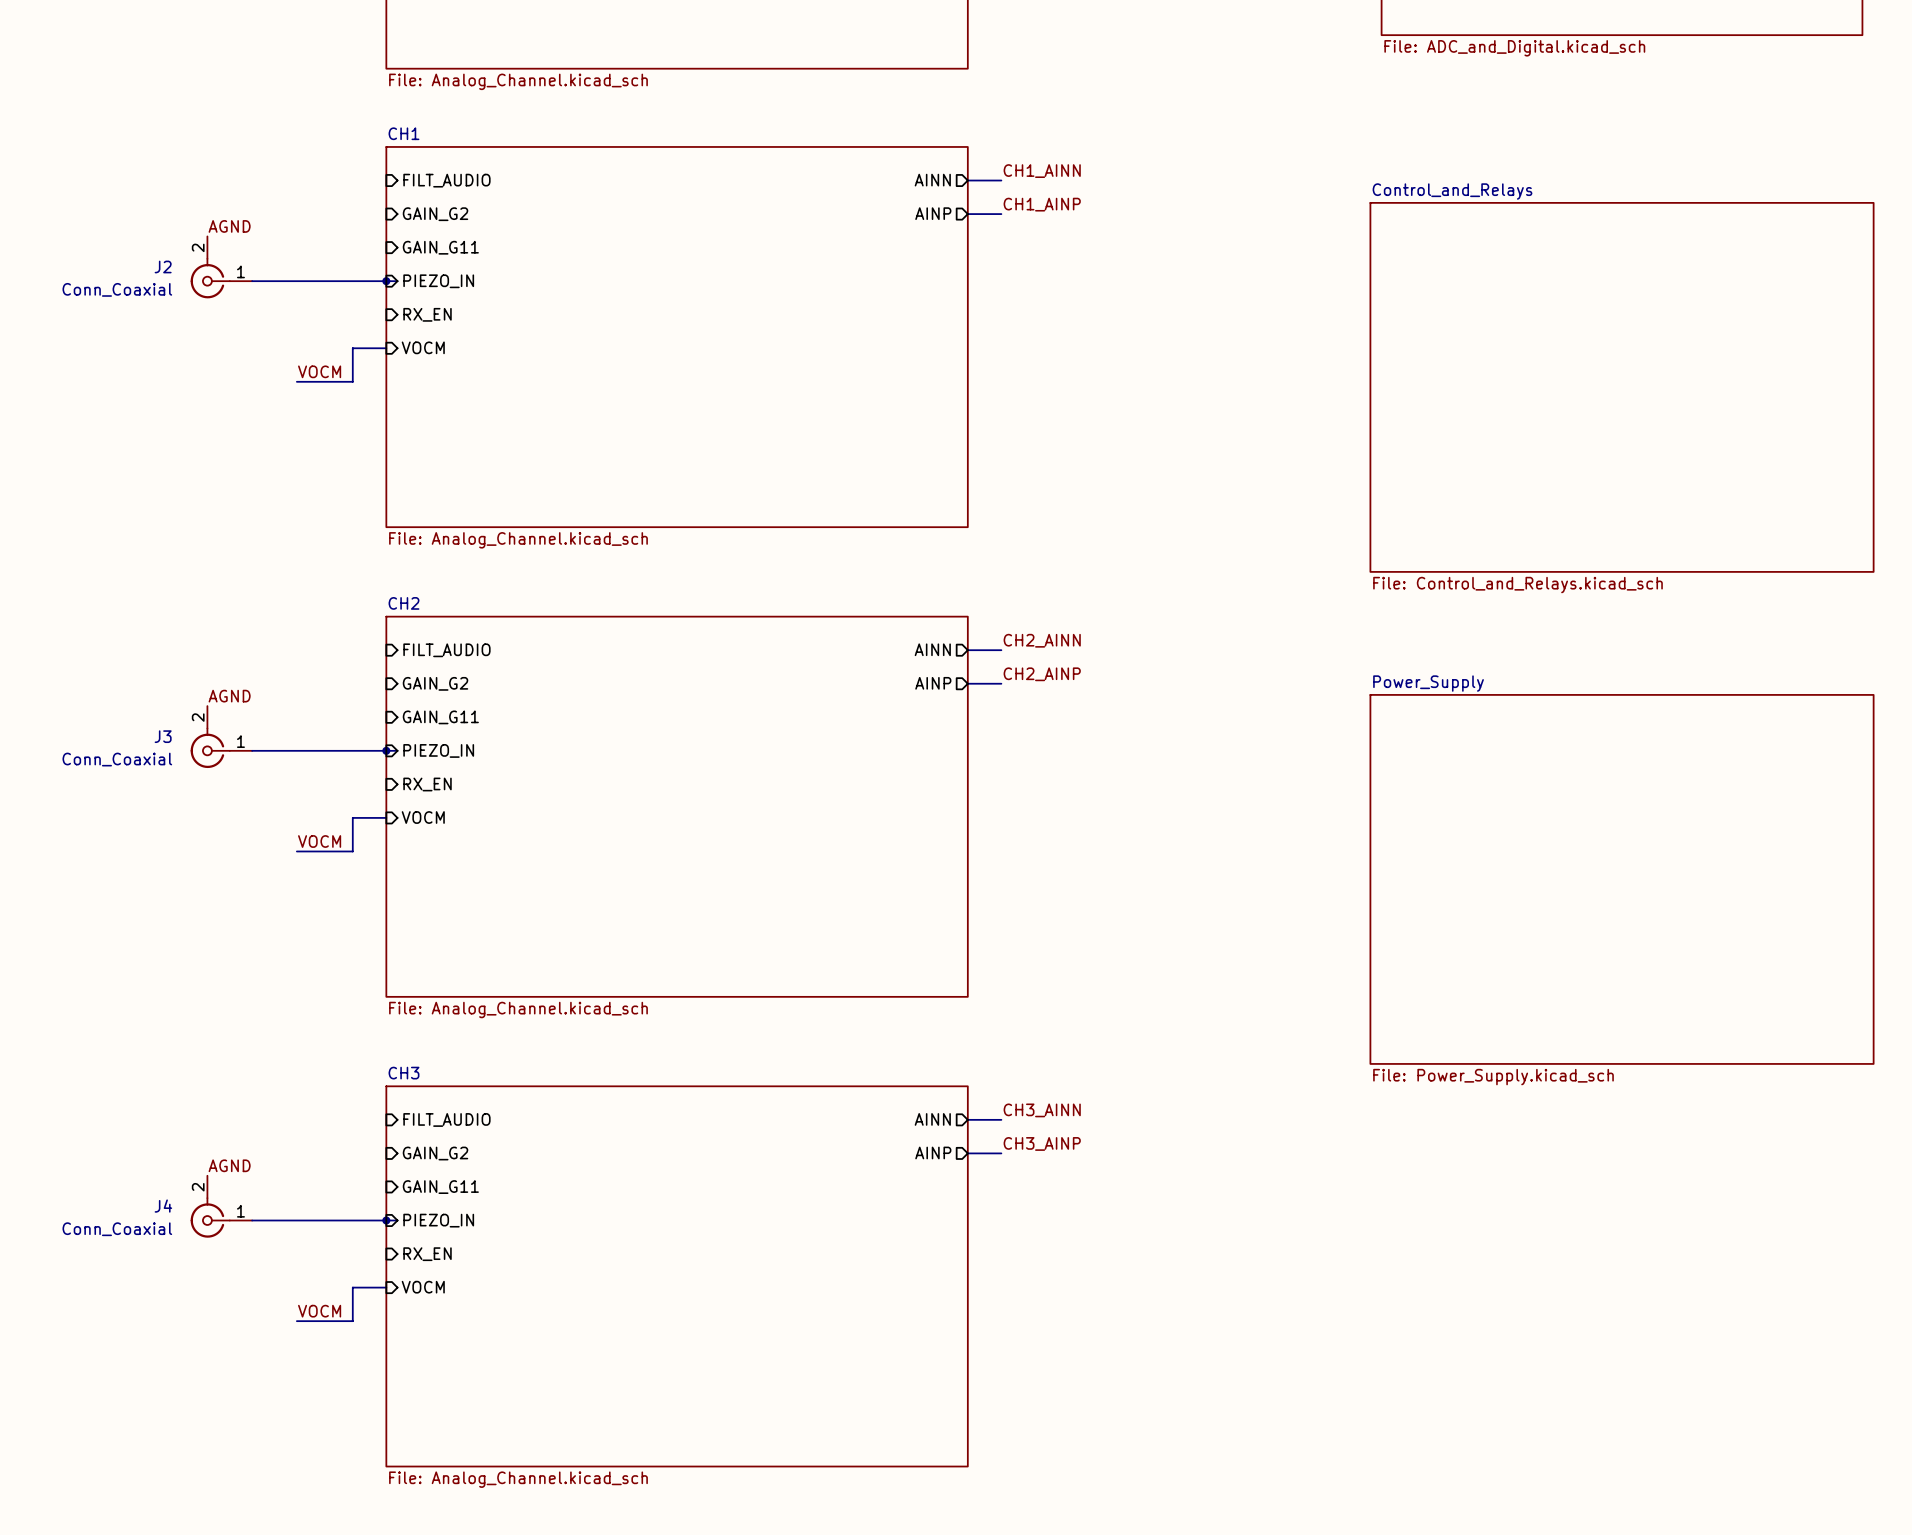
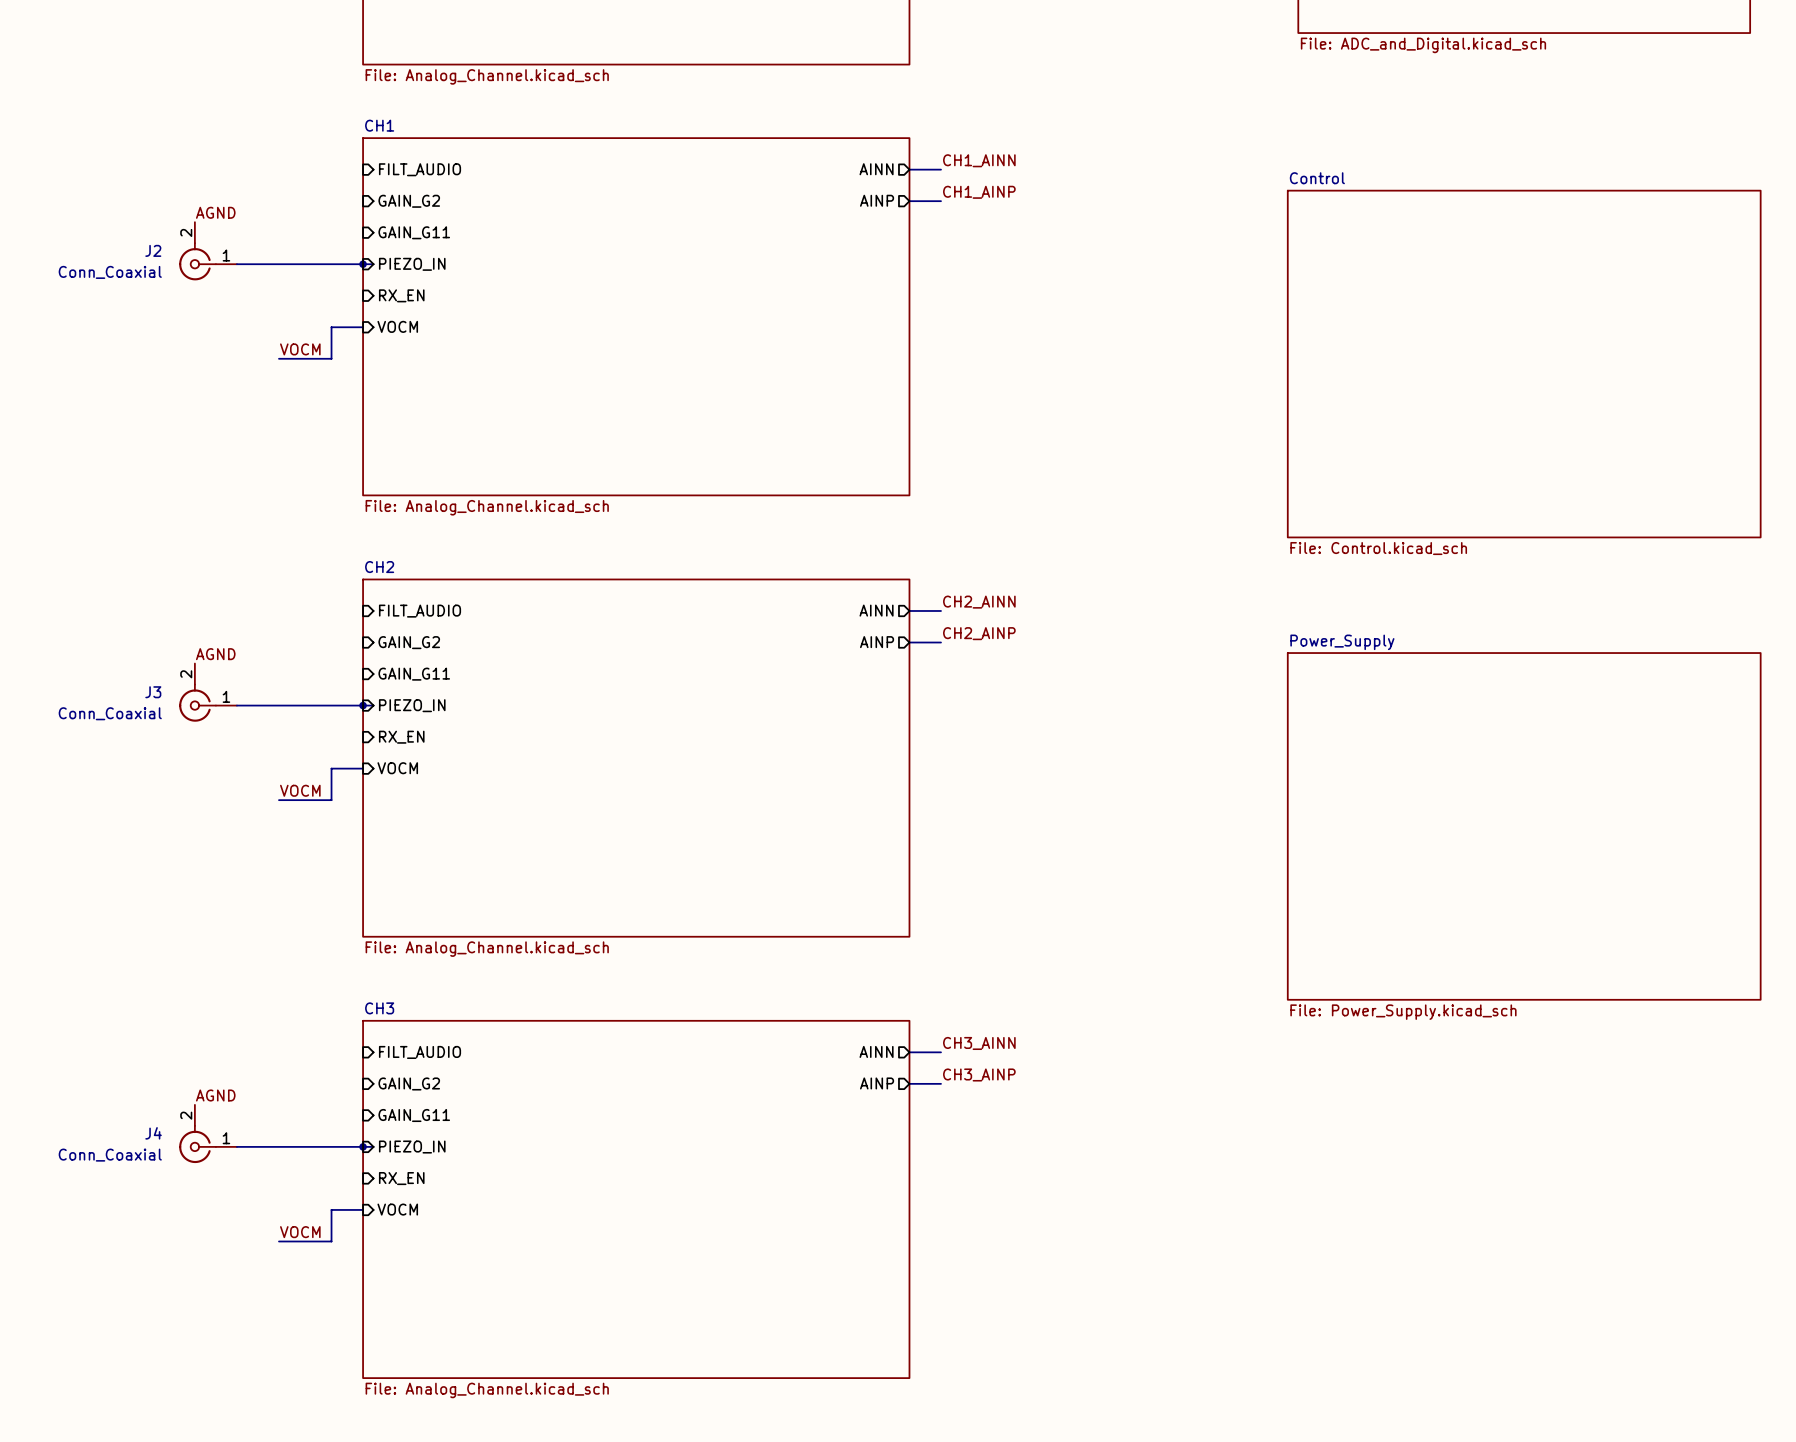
sheet Control_and_Relays name: Control_and_Relays (1452, 191) -> Control (1317, 178)
sheet Control_and_Relays value: File: Control_and_Relays.kicad_sch (1517, 585) -> File: Control.kicad_sch (1378, 548)

